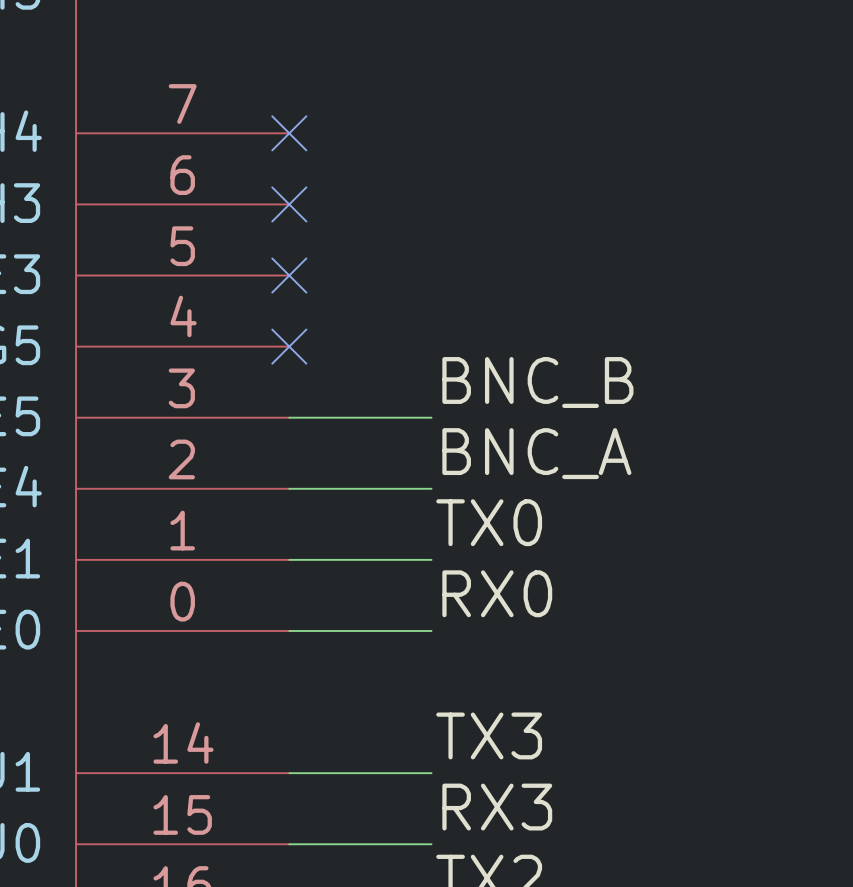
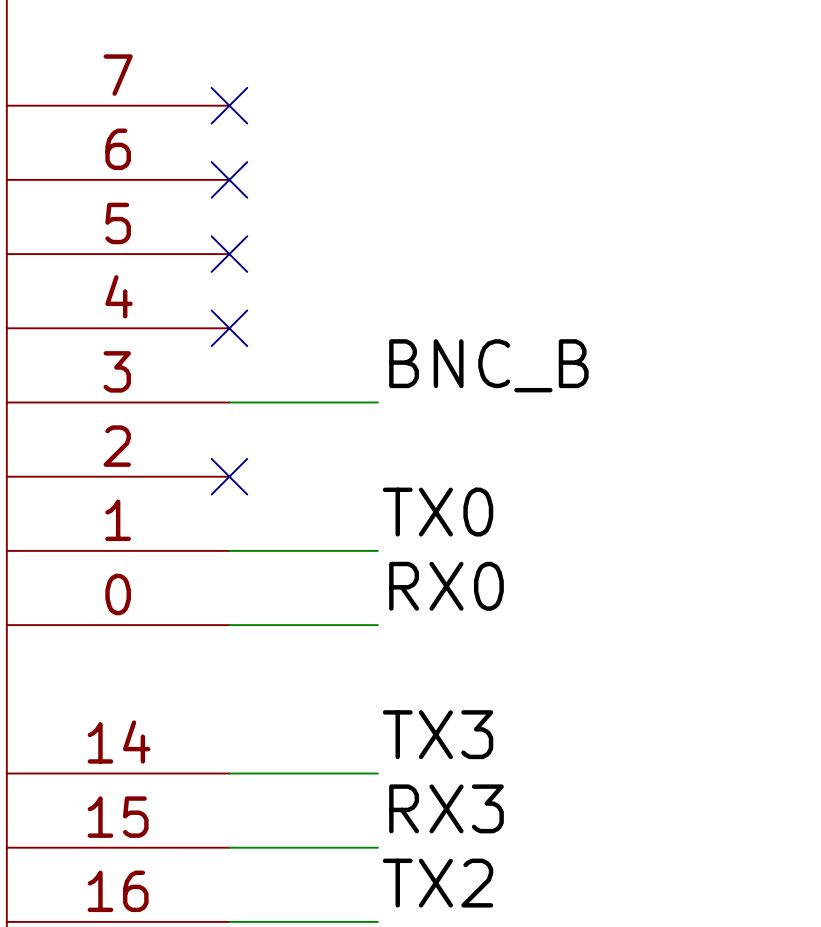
label: BNC_A (536, 453) -> none
wire: (289, 488) (431, 488) -> none
no-connect mark: none -> (229, 476)

